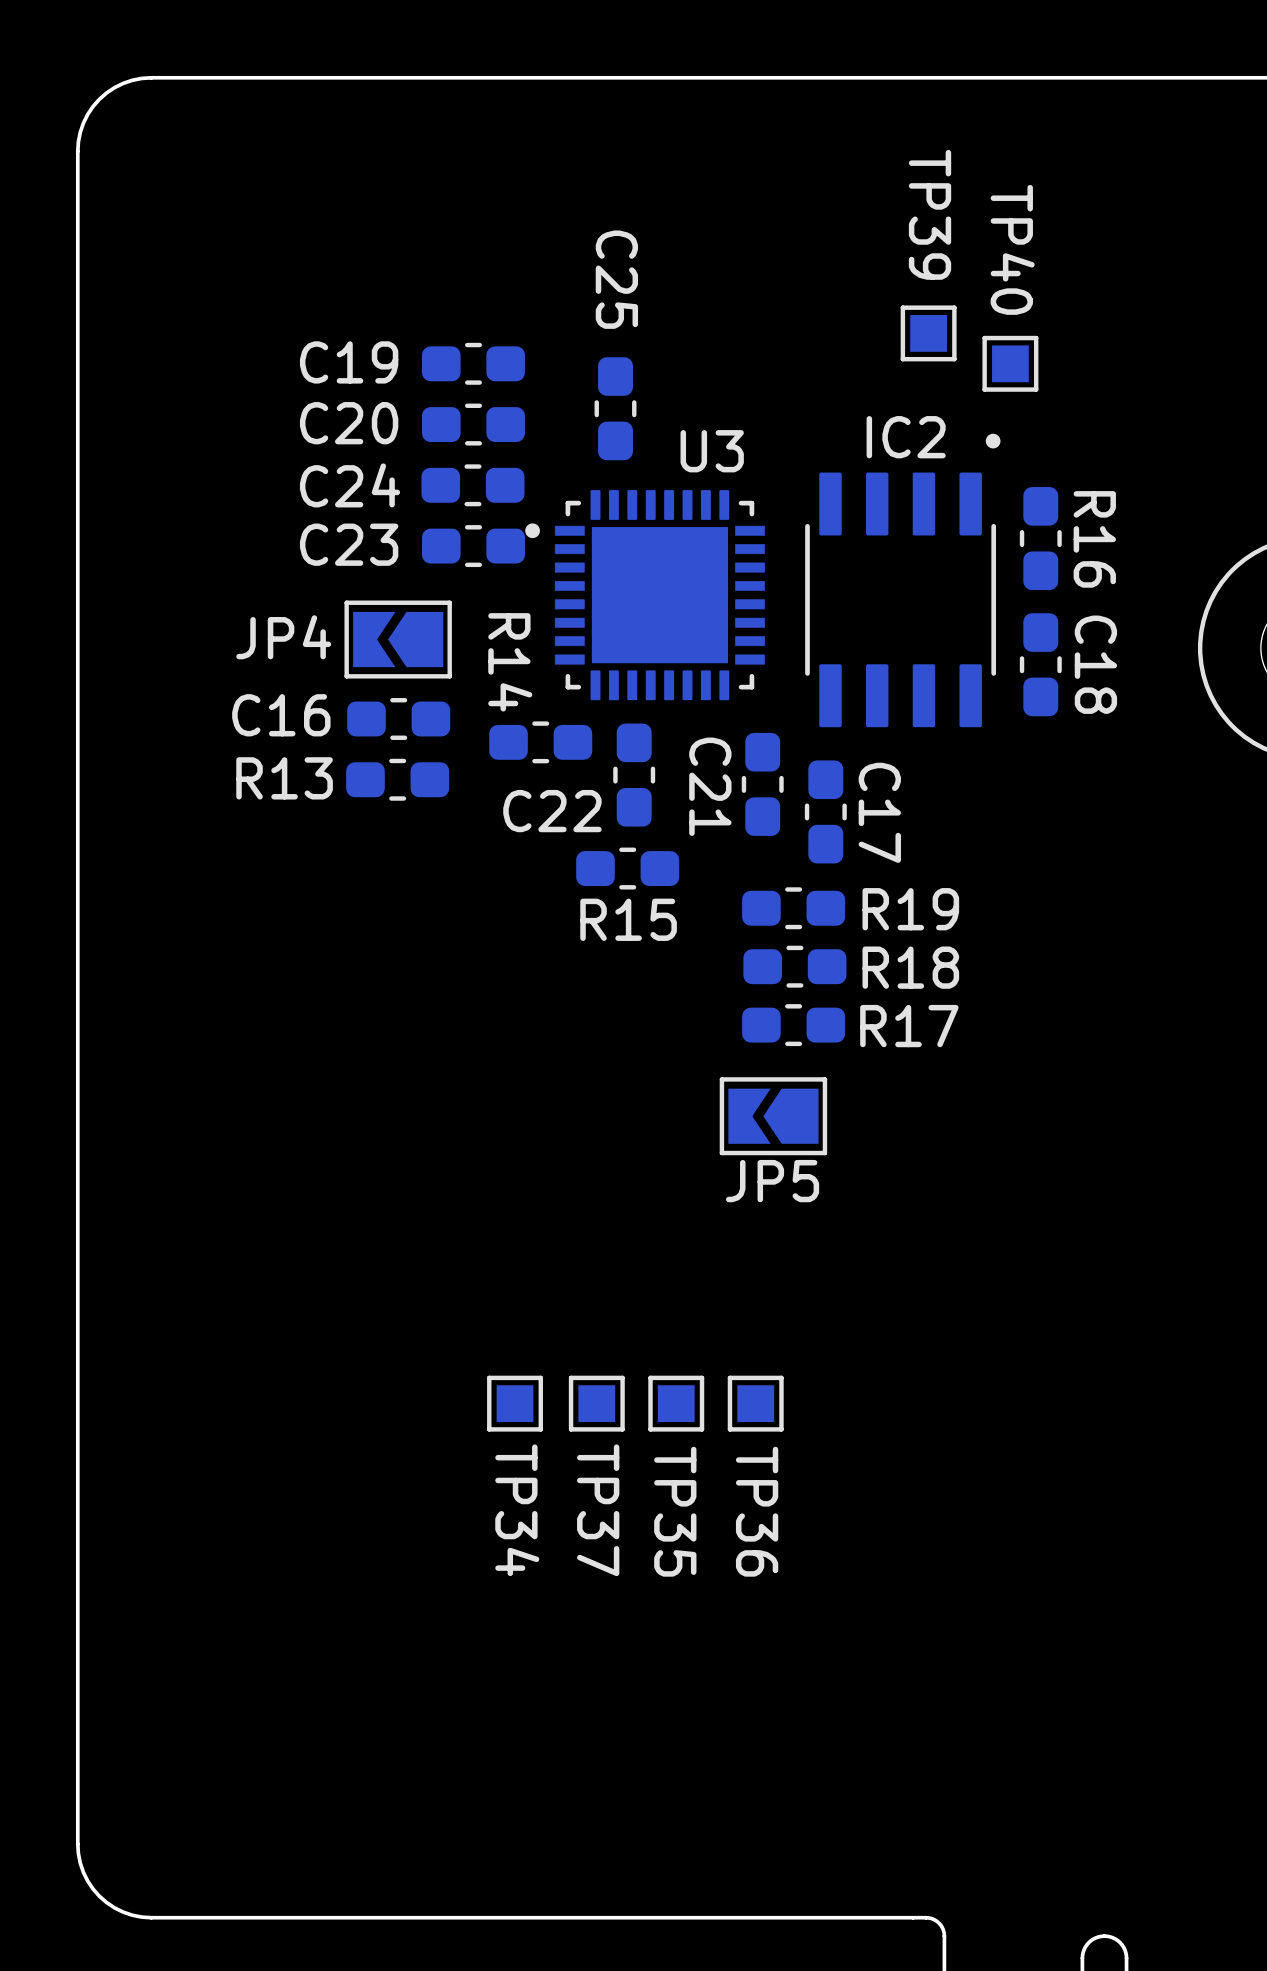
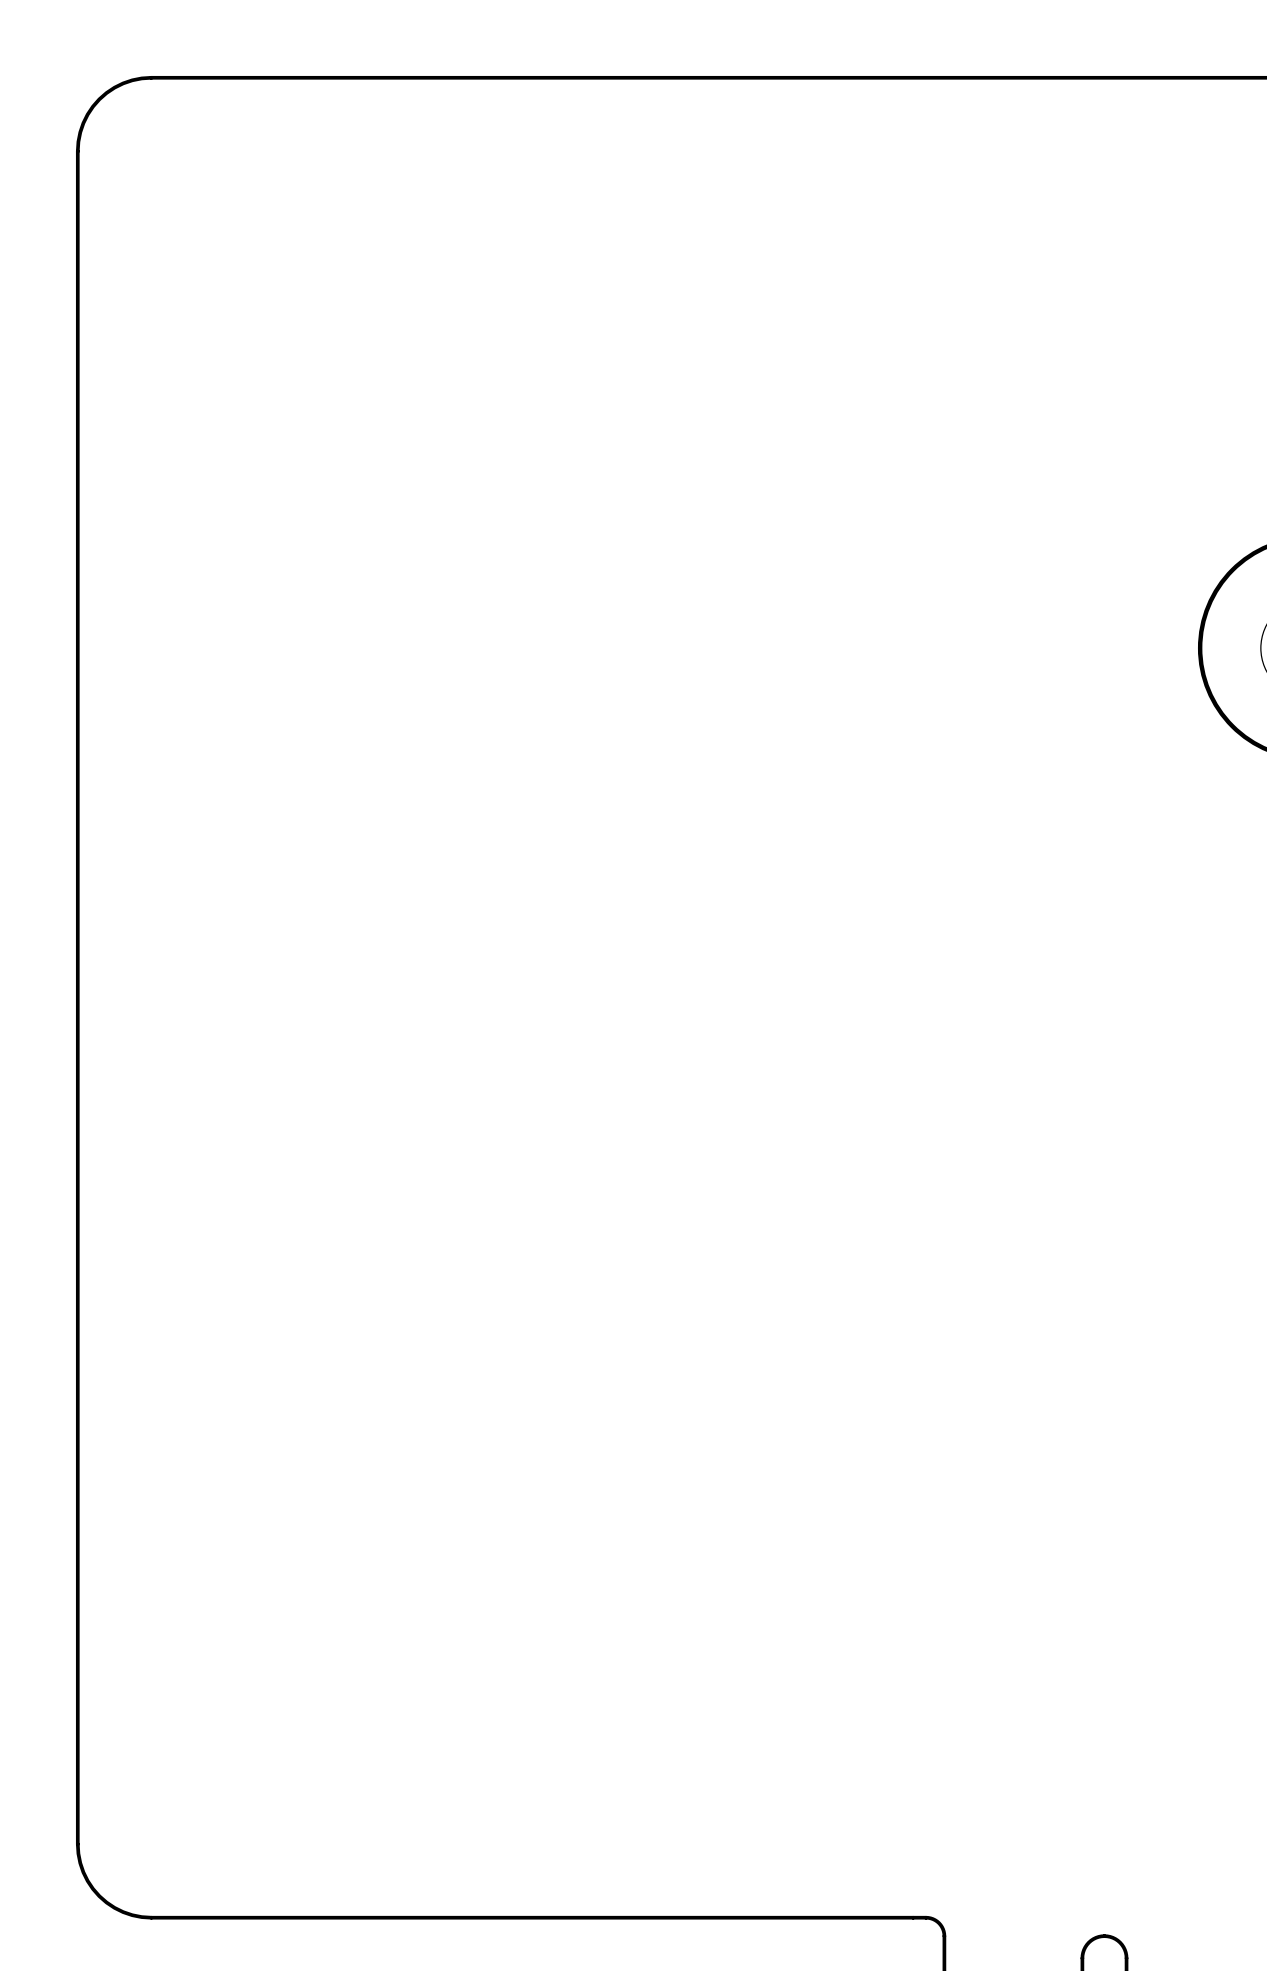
TP39: (928, 333) -> none
C19: (473, 363) -> none
TP40: (1010, 363) -> none
C25: (615, 408) -> none
C20: (473, 424) -> none
C24: (472, 485) -> none
R16: (1040, 538) -> none
C23: (473, 546) -> none
IC2: (902, 580) -> none
U3: (645, 595) -> none
JP4: (398, 639) -> none
C18: (1040, 664) -> none
C16: (398, 718) -> none
R14: (540, 742) -> none
C22: (634, 775) -> none
R13: (397, 779) -> none
C21: (762, 784) -> none
C17: (825, 811) -> none
R15: (627, 868) -> none
R19: (793, 908) -> none
R18: (794, 966) -> none
R17: (793, 1025) -> none
JP5: (773, 1116) -> none
TP34: (515, 1403) -> none
TP37: (596, 1403) -> none
TP35: (676, 1403) -> none
TP36: (755, 1403) -> none

